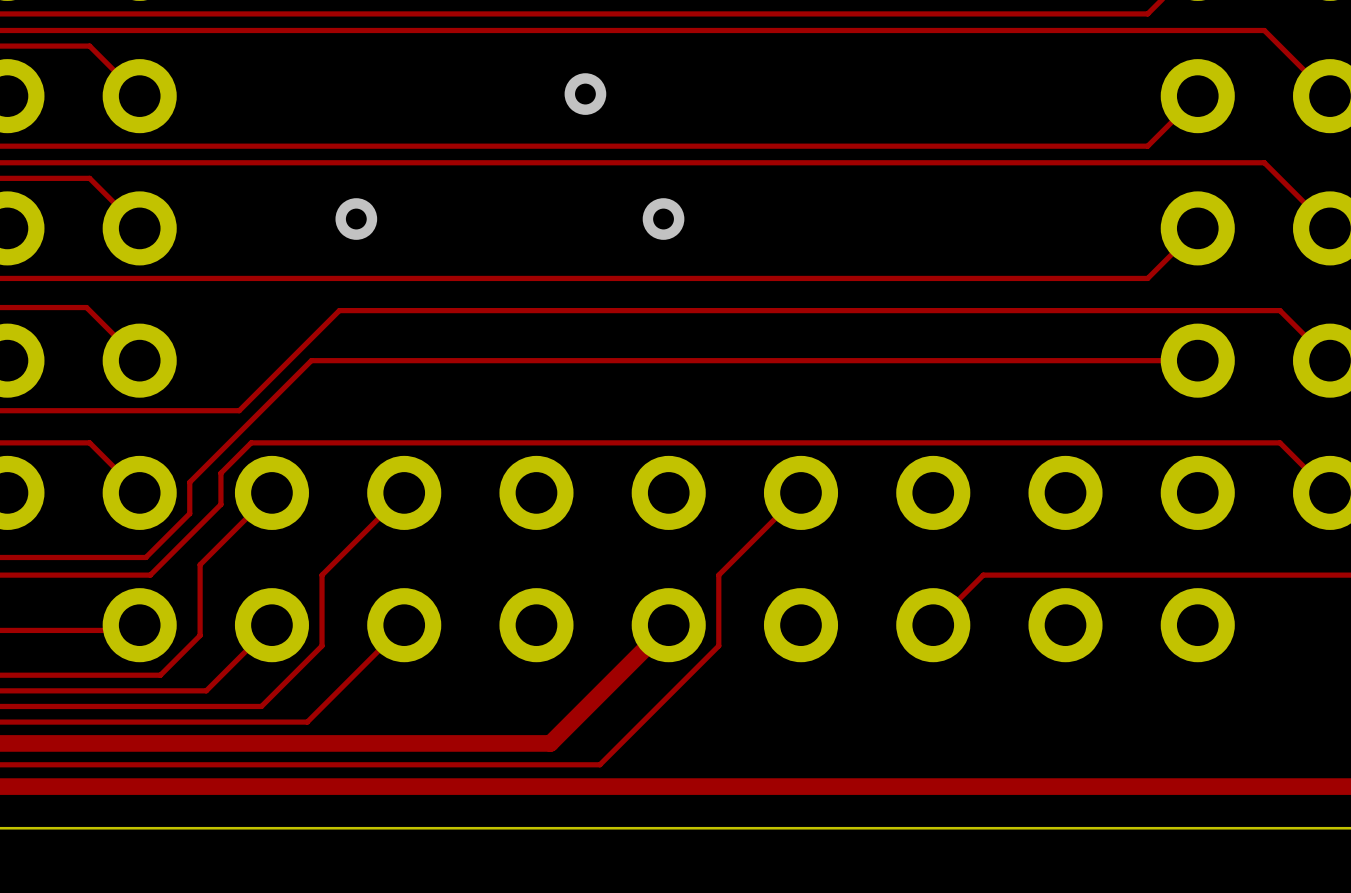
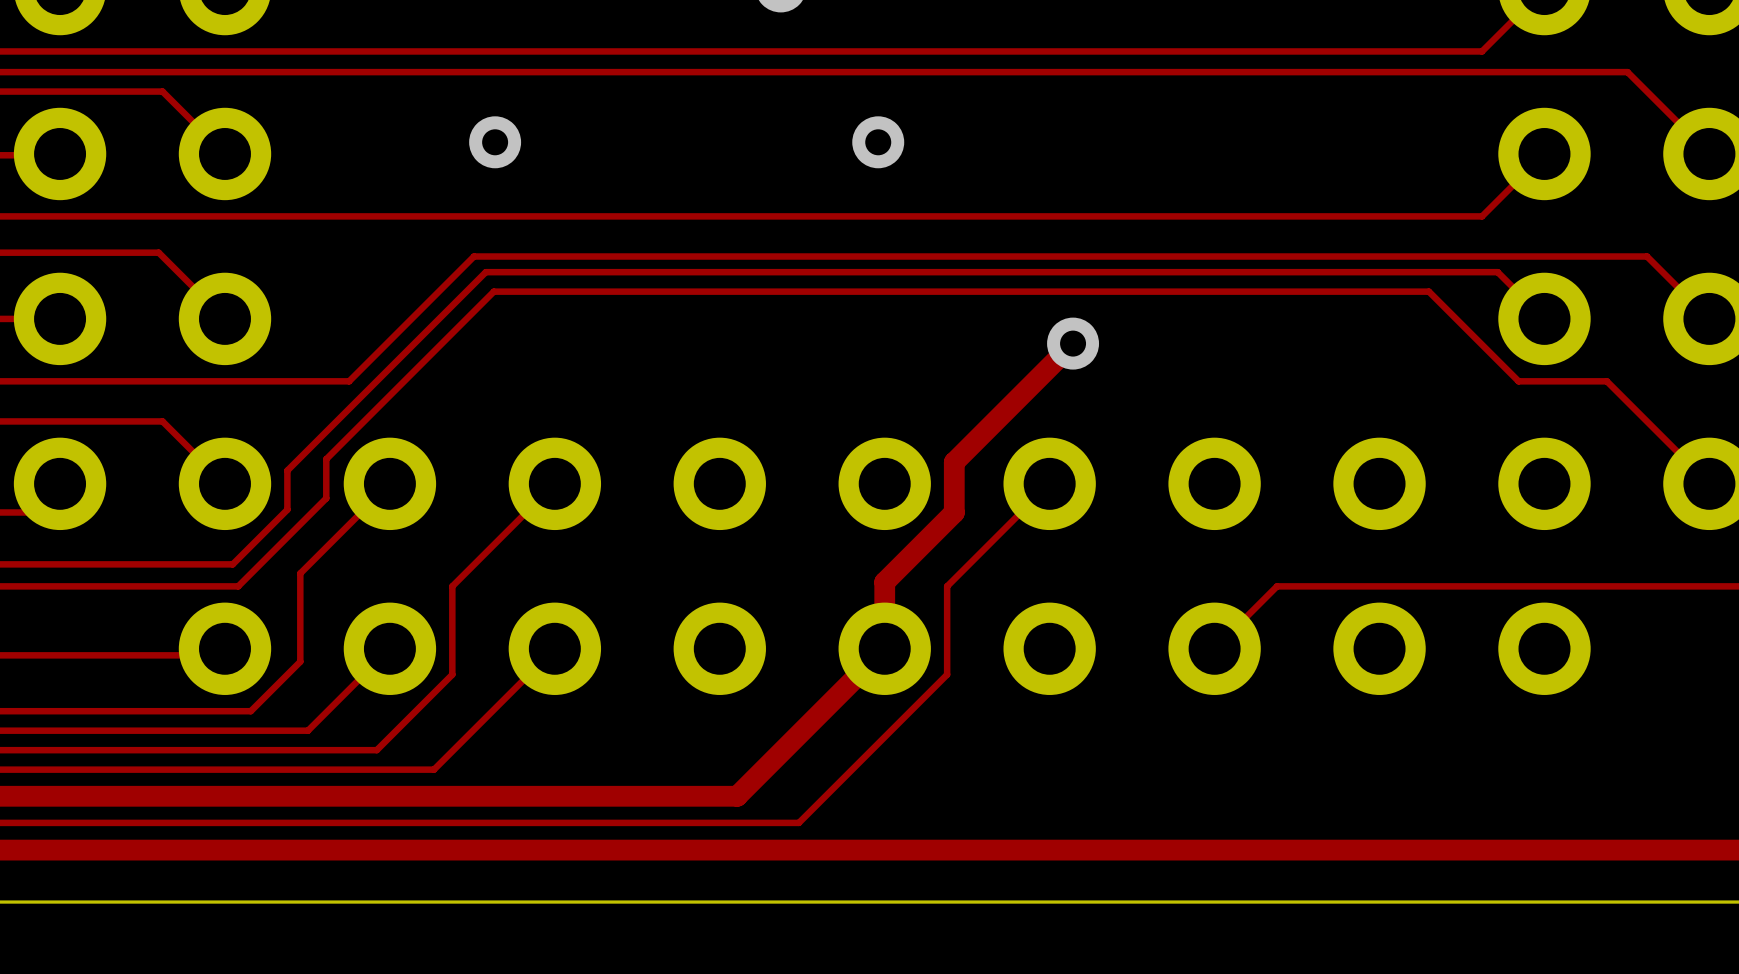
track: (311, 360) (1197, 360) -> (439, 318) (485, 272) (1497, 272) (1544, 318)
track: none -> (1073, 343) (954, 462) (954, 512) (884, 582) (884, 648)
via: none -> (1073, 343)
track: (251, 442) (1279, 442) -> (364, 421) (493, 291) (1428, 291) (1518, 381) (1606, 381) (1647, 421)

